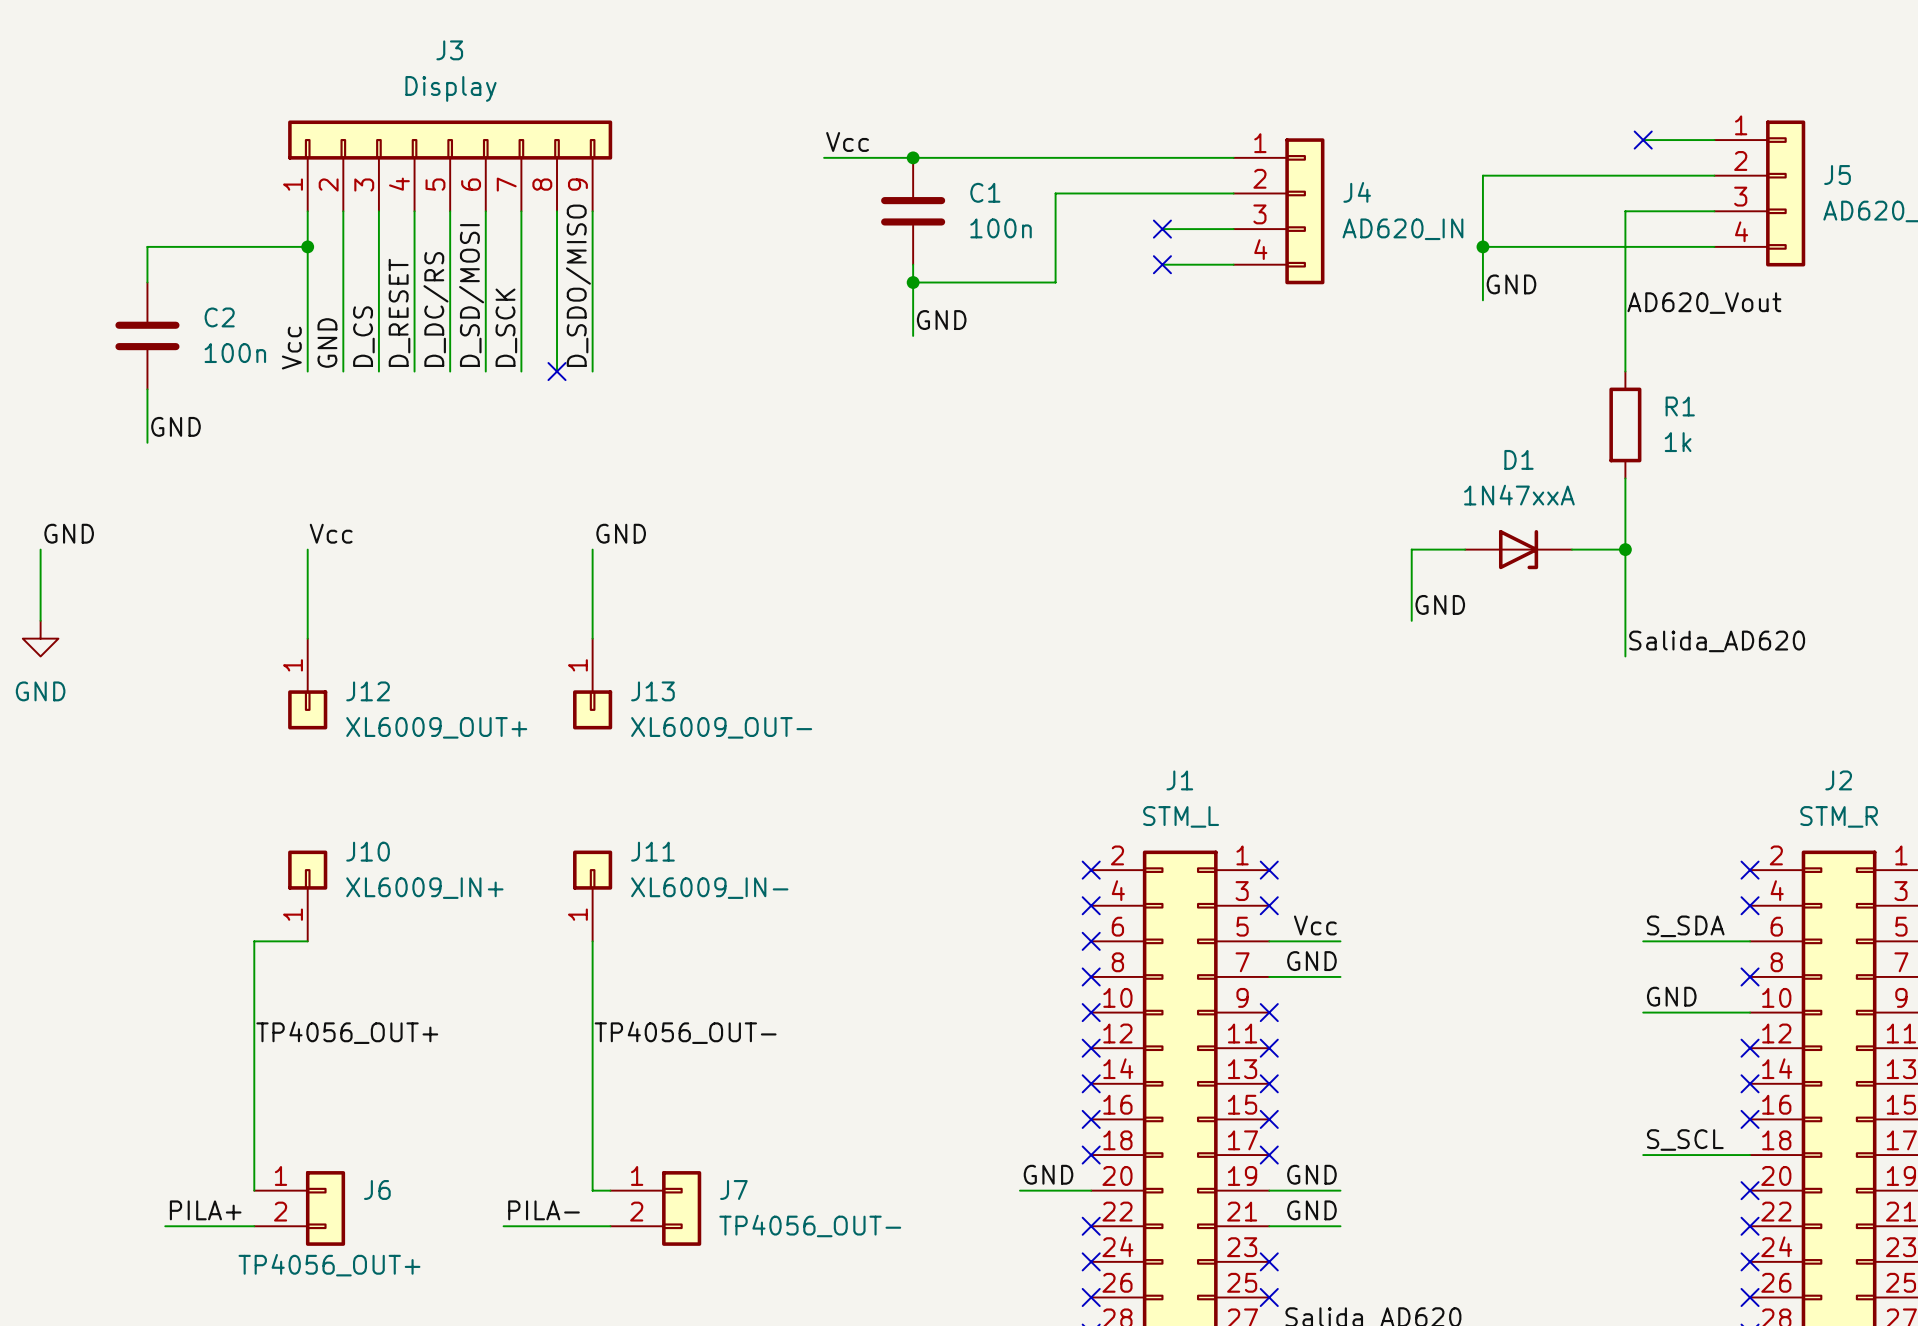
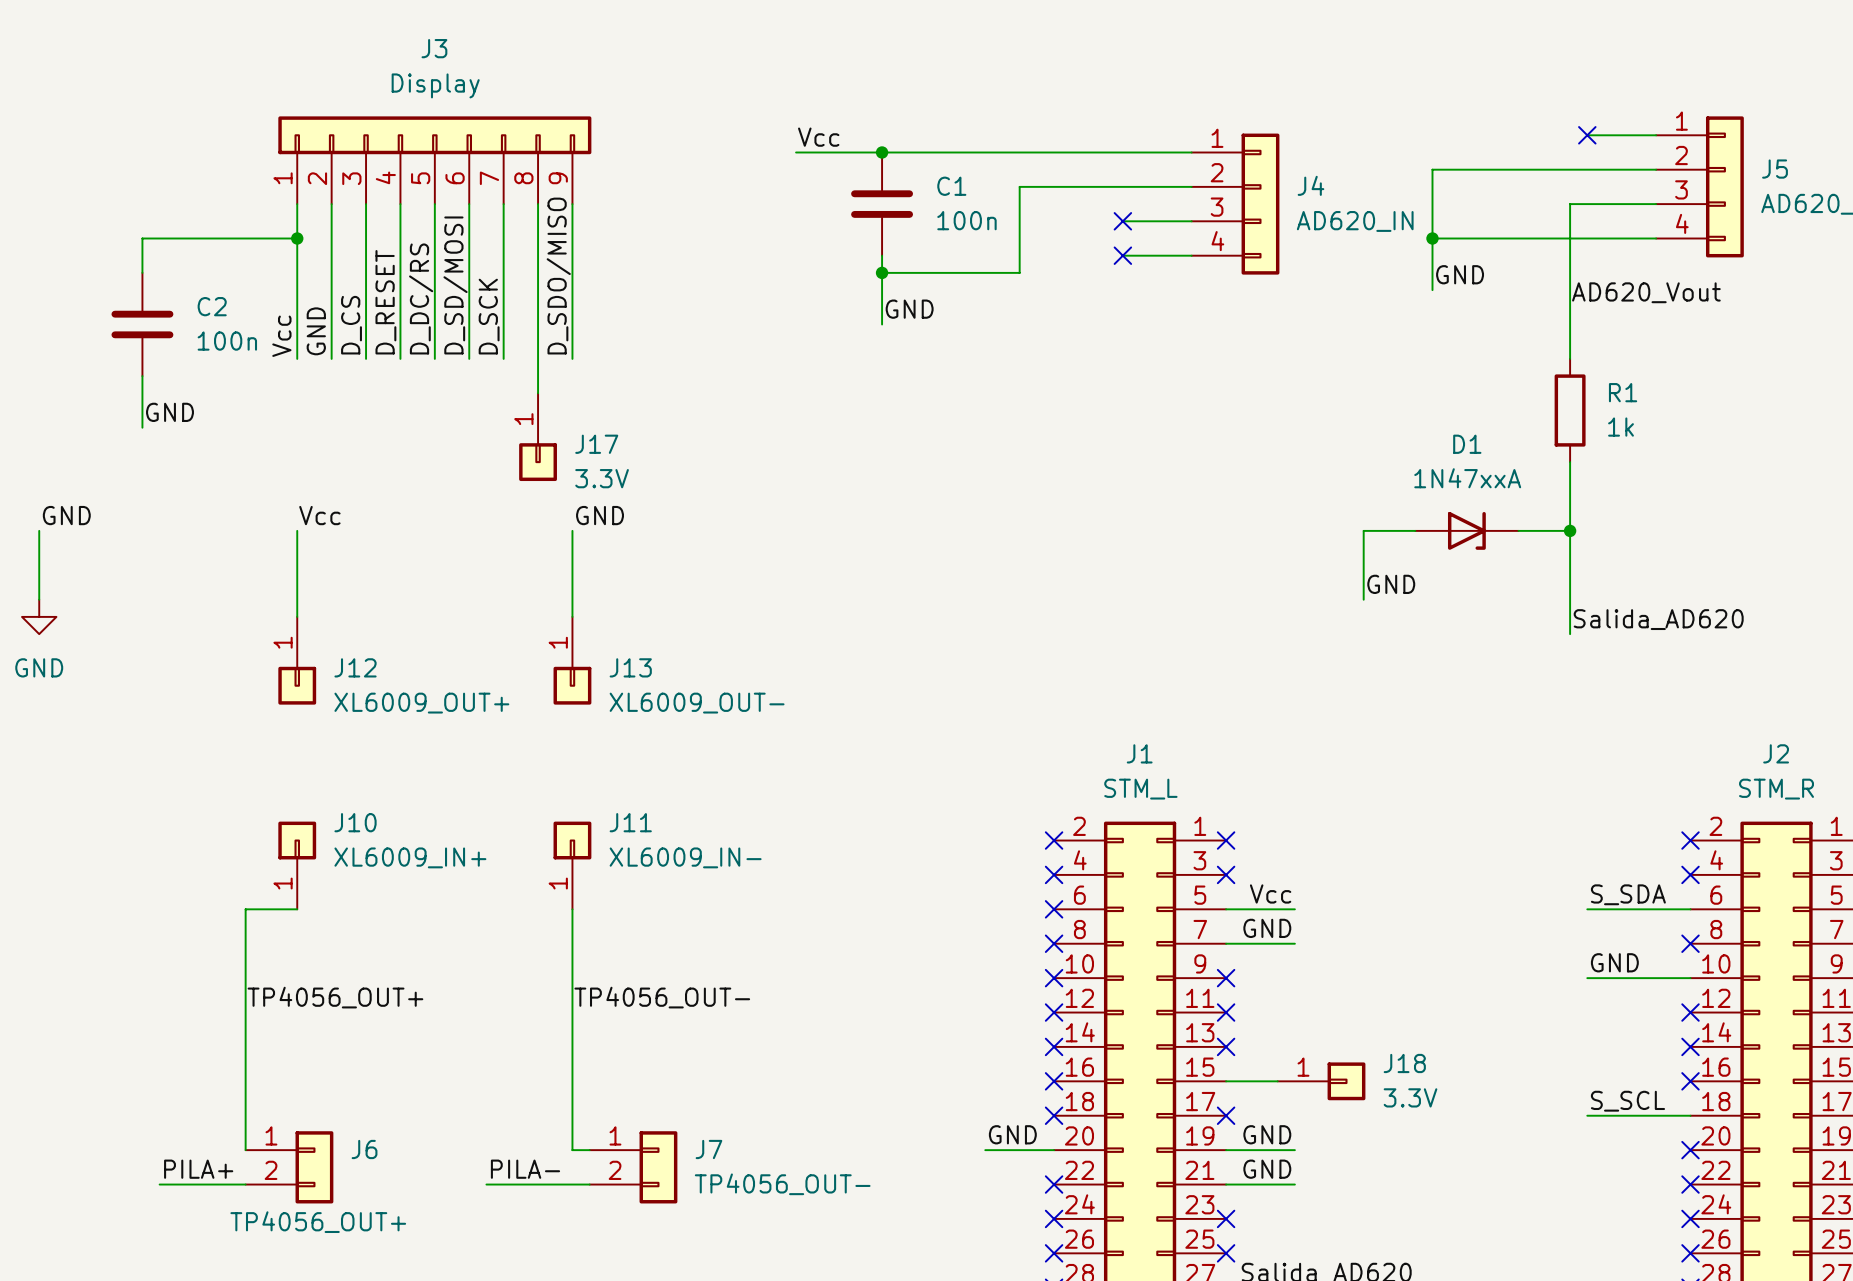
wire: none -> (538, 358) (538, 393)
no-connect mark: (557, 371) -> none
J17: none -> 3.3V (538, 437)
wire: none -> (1226, 1081) (1277, 1081)
no-connect mark: (1269, 1119) -> none
J18: none -> 3.3V (1321, 1081)

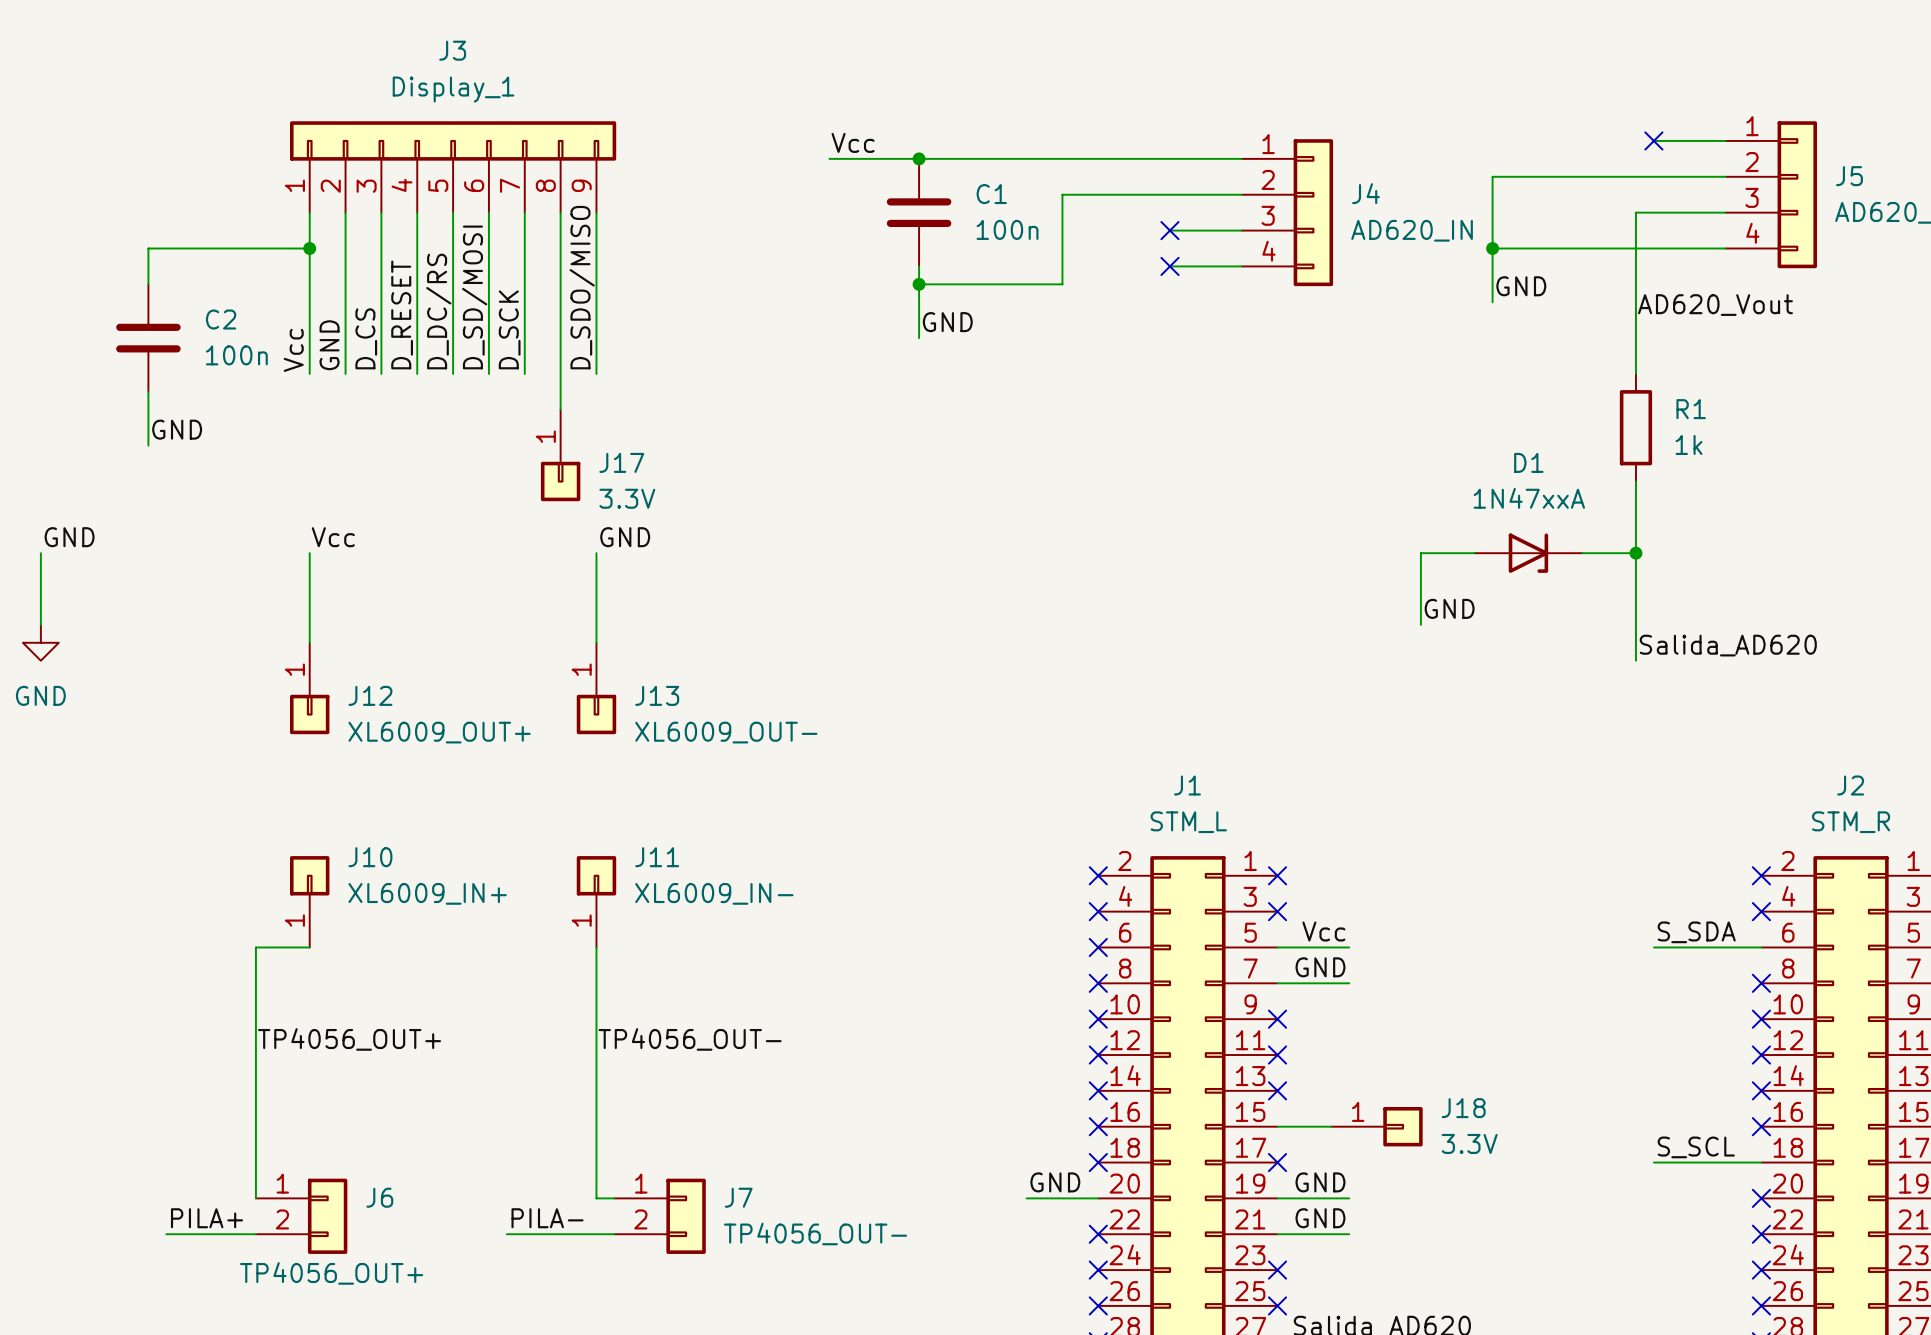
J3 value: Display (435, 85) -> Display_1 (453, 89)
label: GND (1614, 962) -> none
wire: (1587, 978) (1690, 978) -> none
no-connect mark: none -> (1761, 1019)

